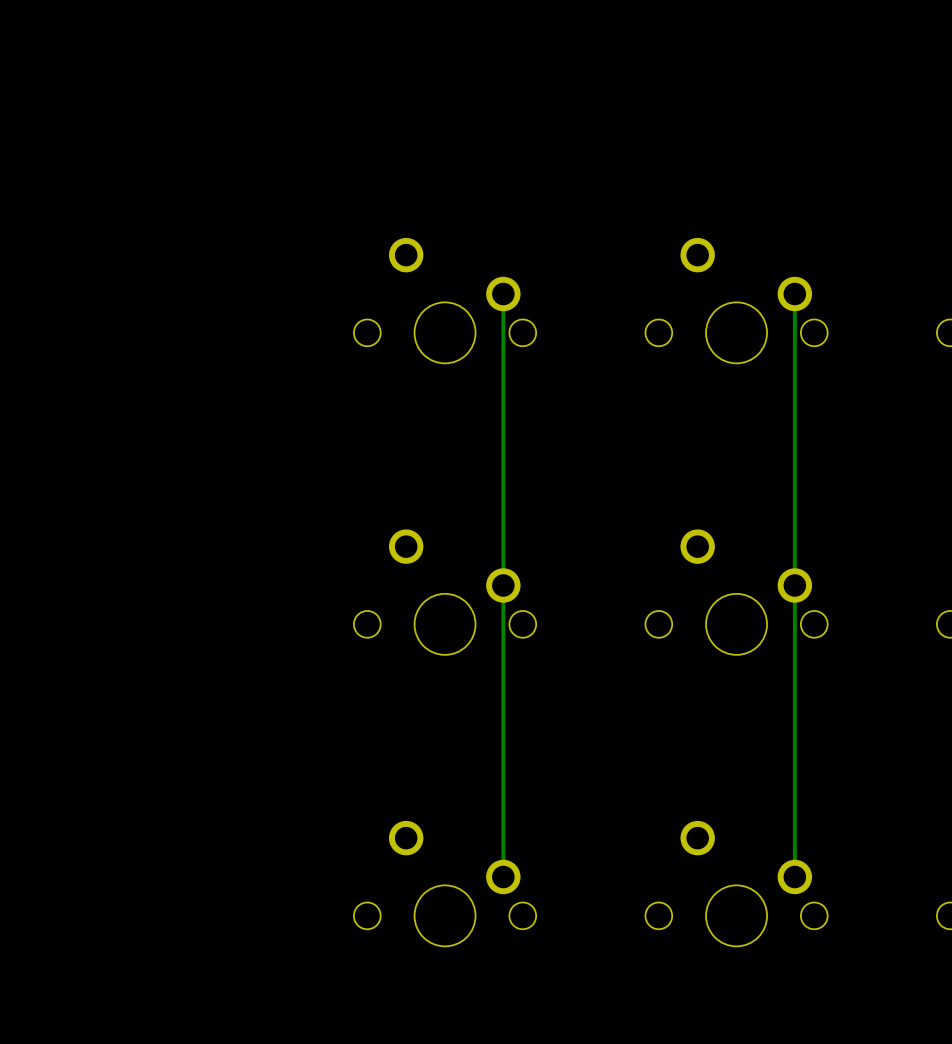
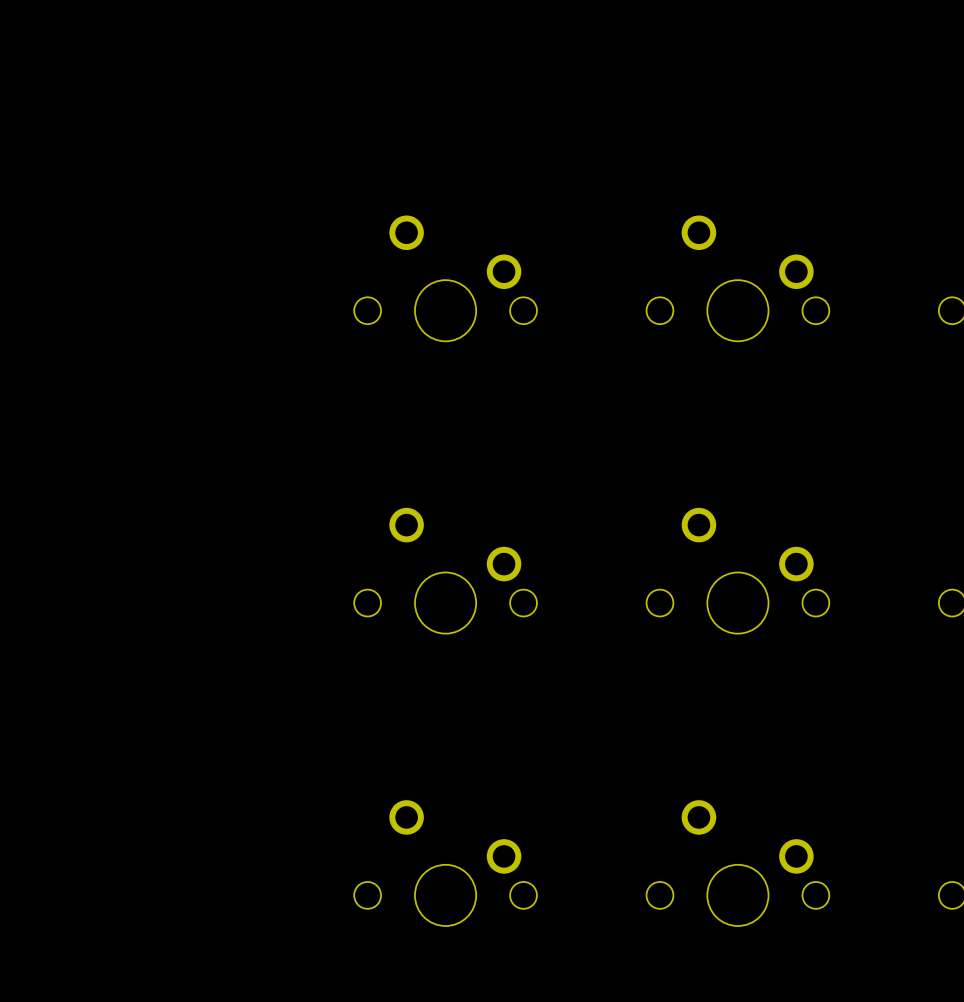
track: (503, 293) (503, 876) -> none
track: (794, 293) (794, 876) -> none

